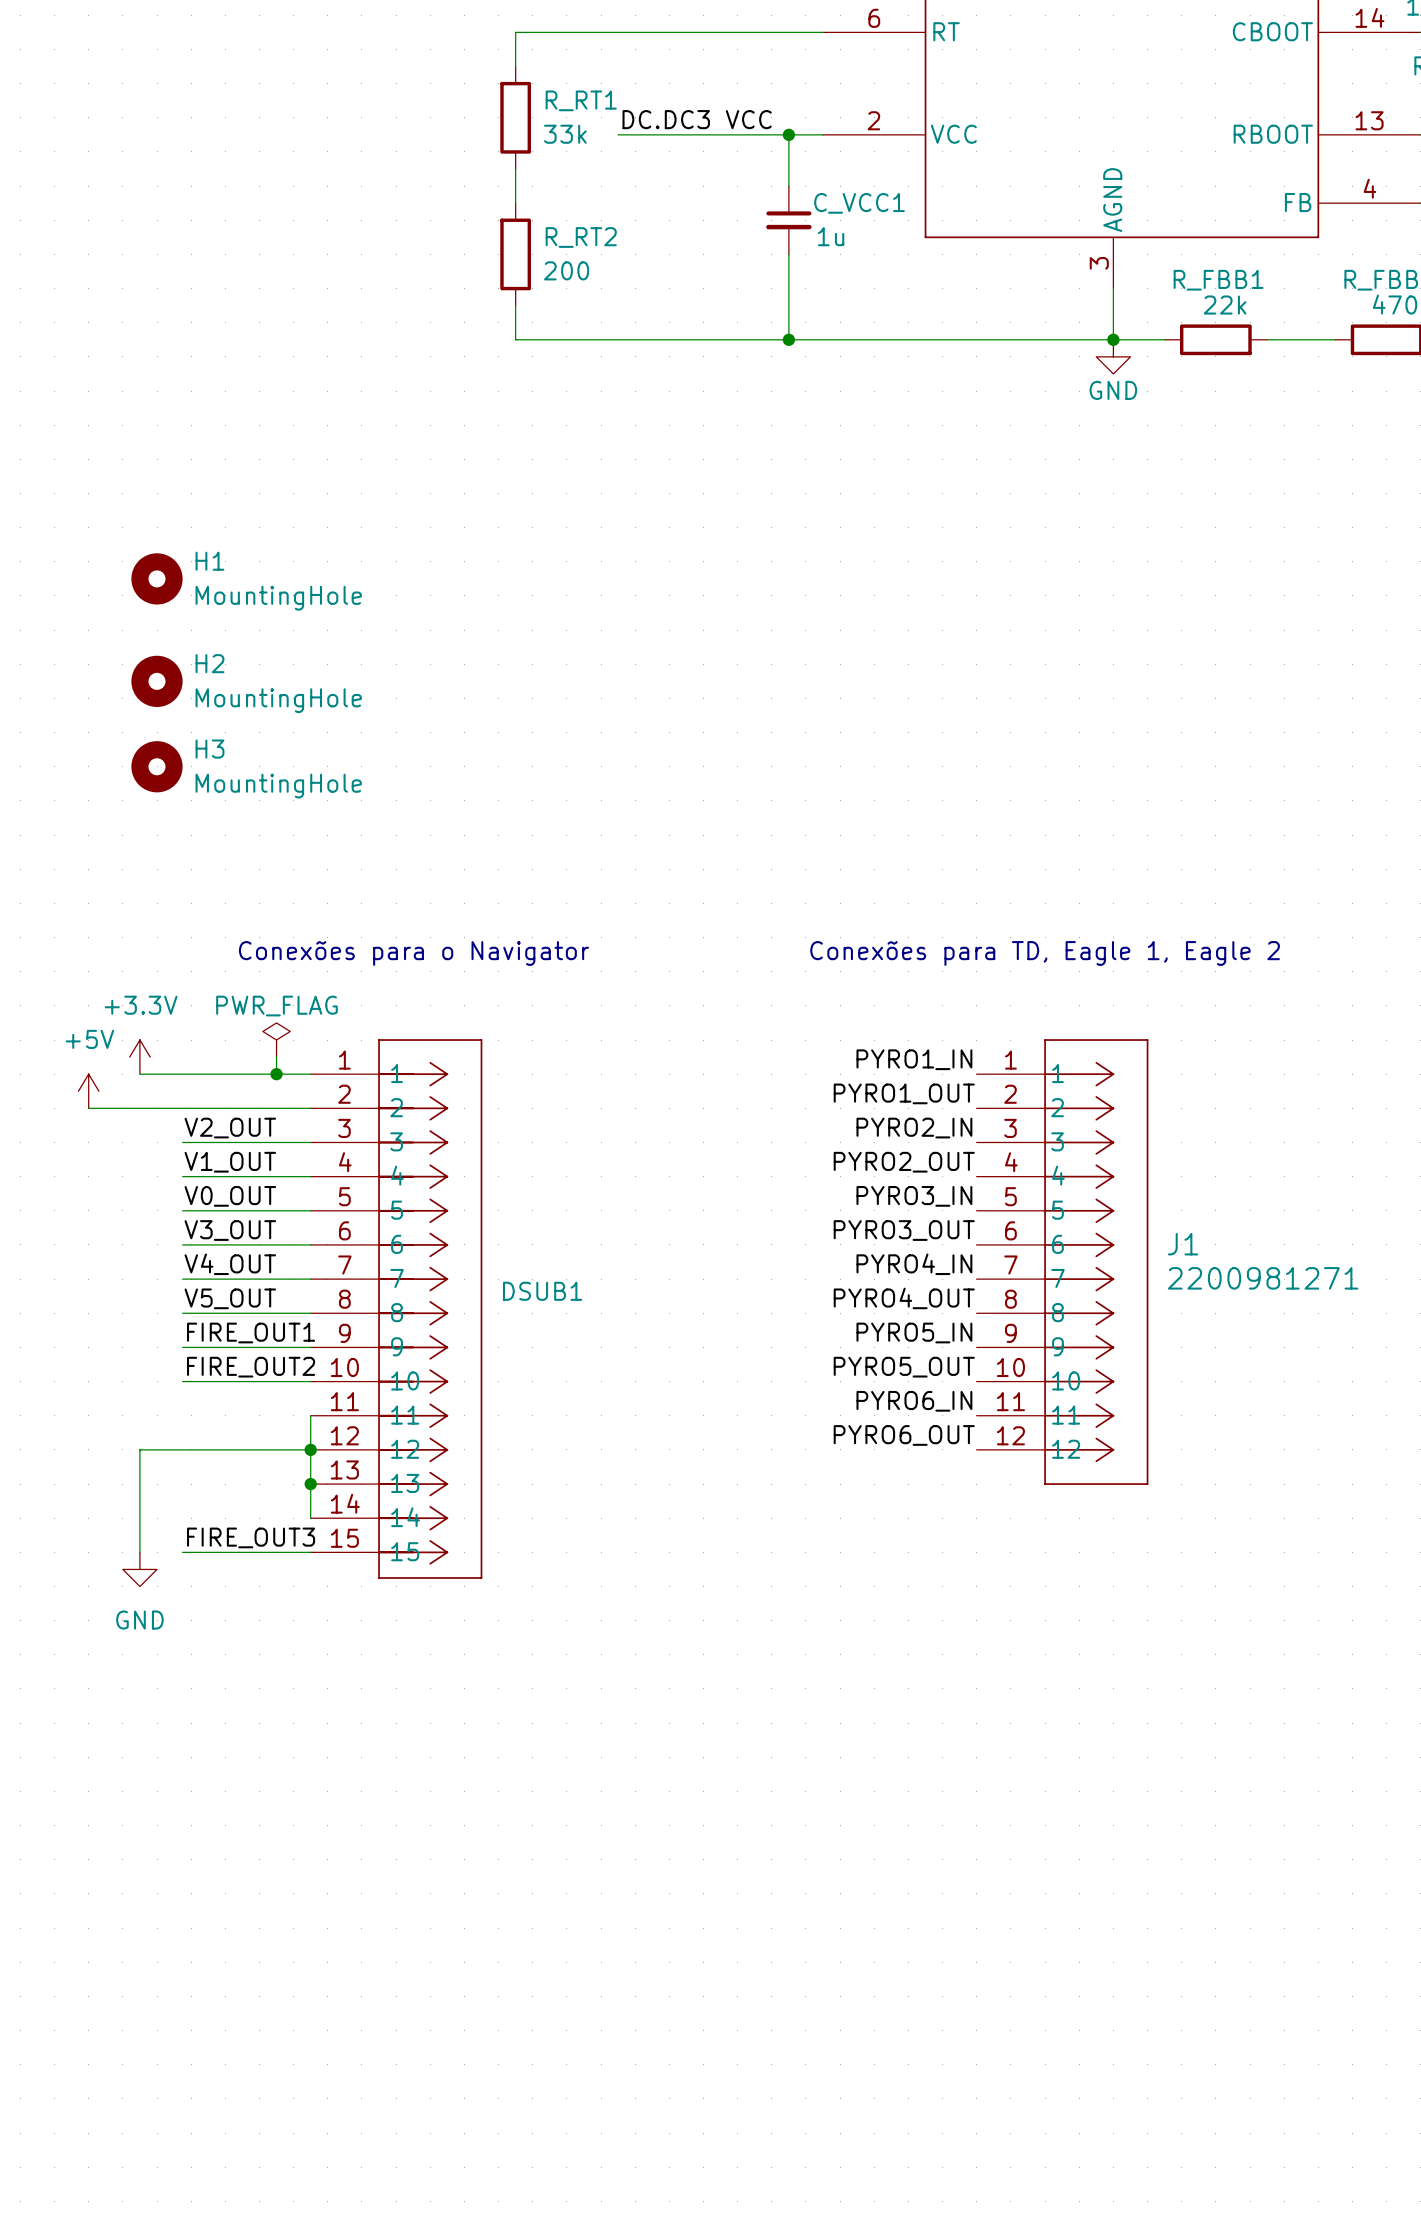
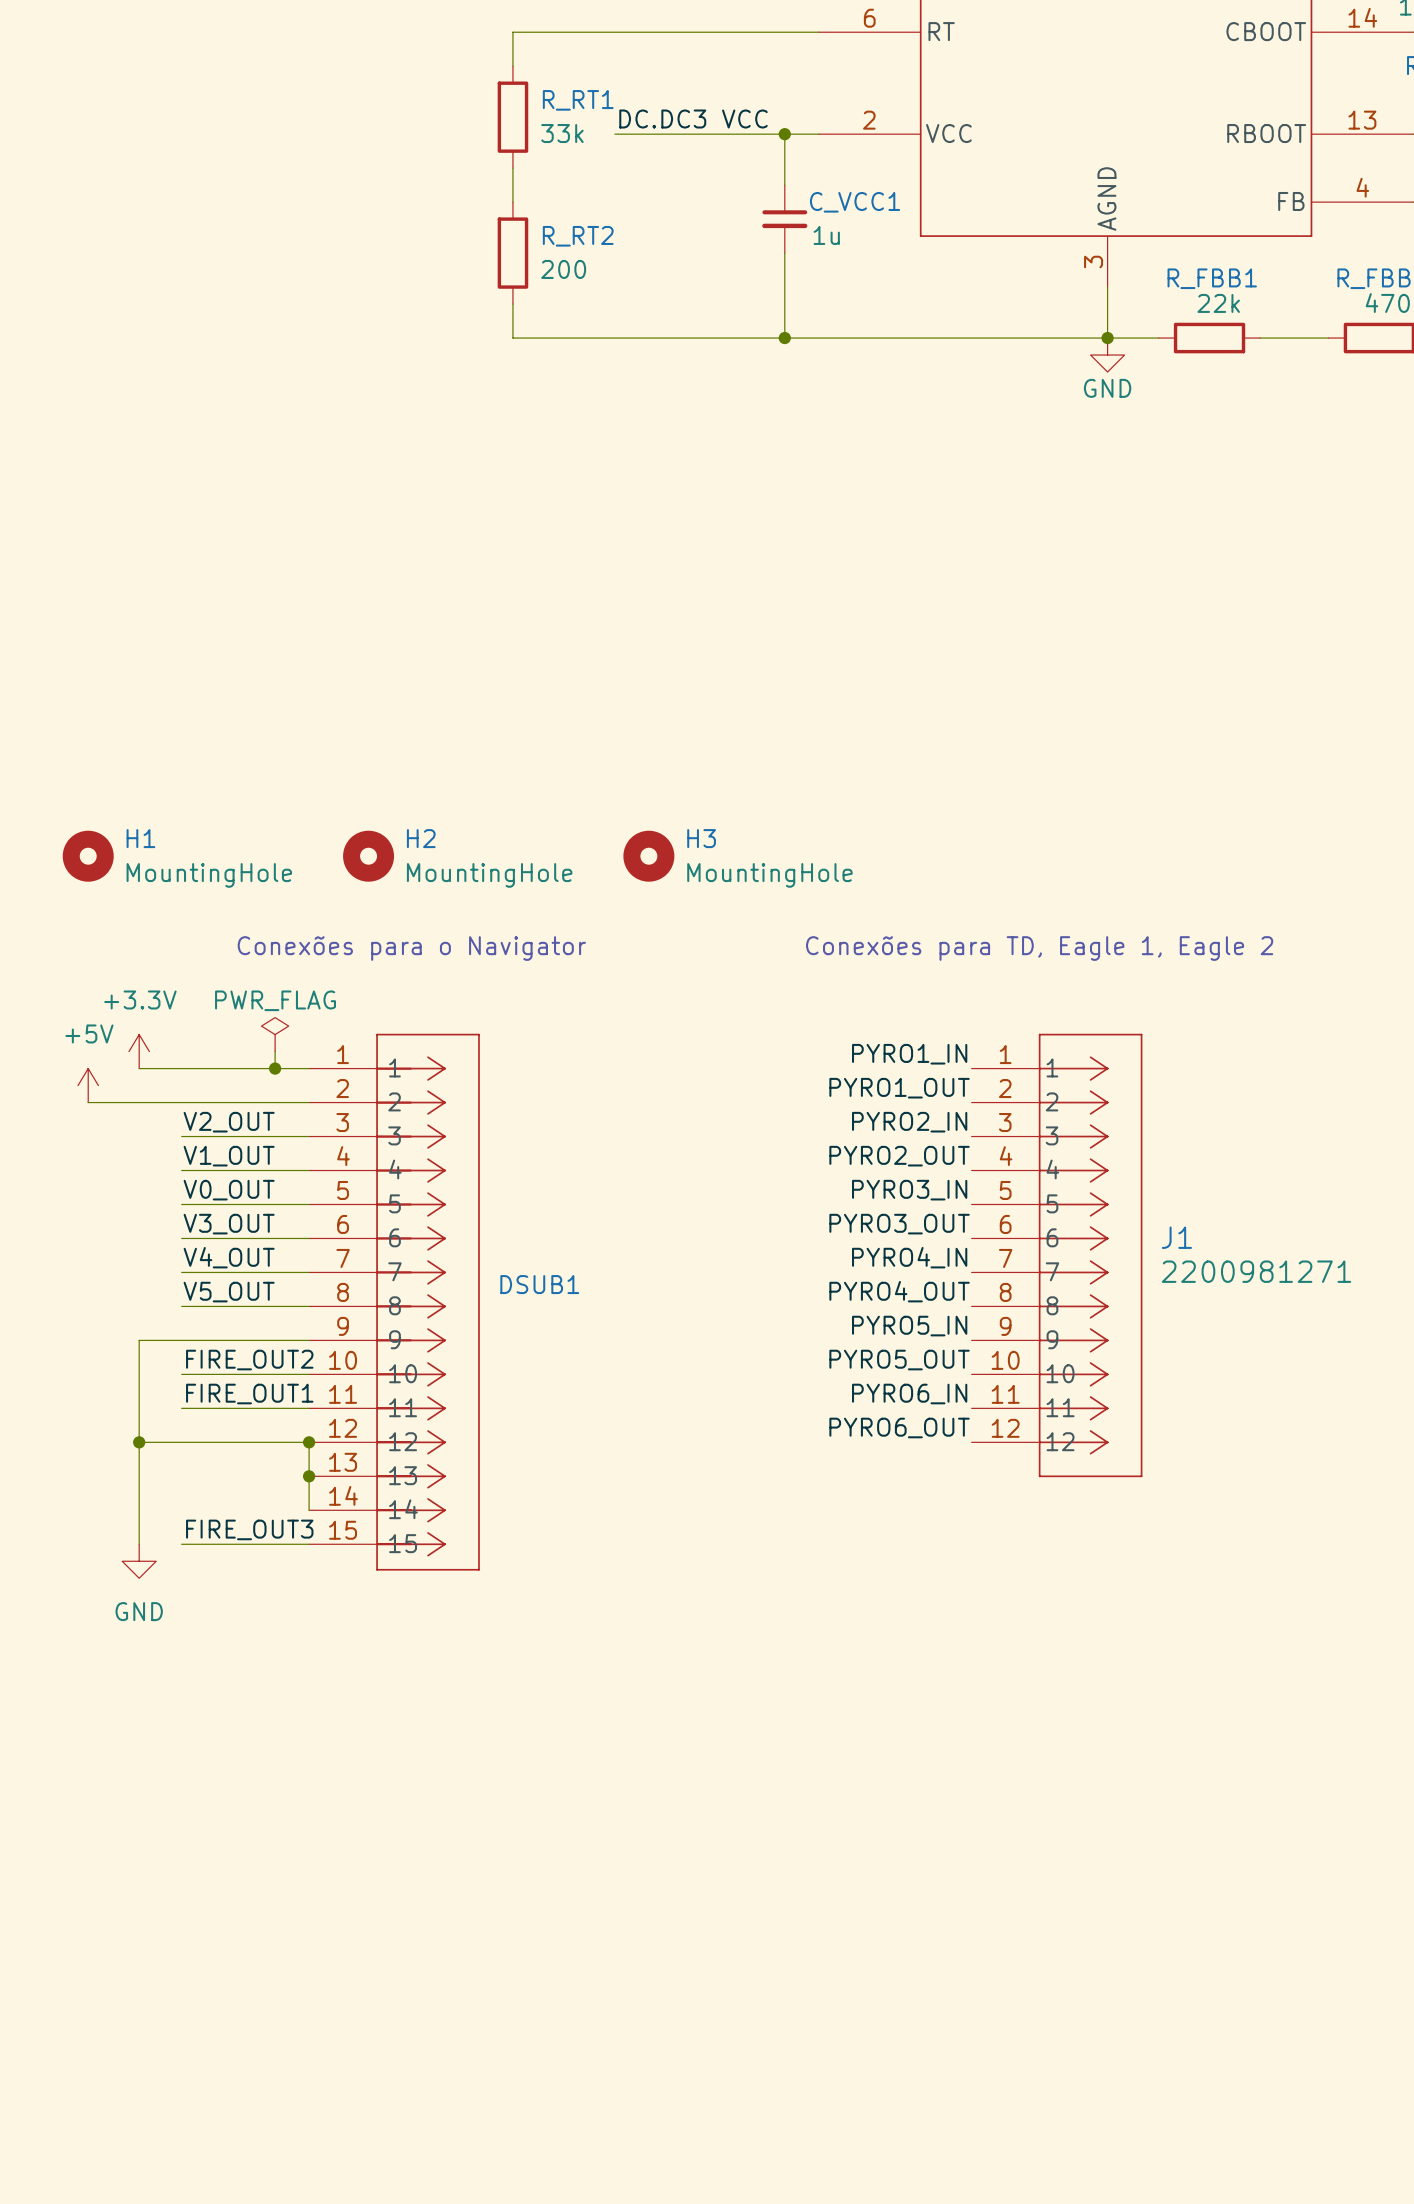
H1 position: (157, 578) -> (88, 856)
H2 position: (157, 681) -> (368, 856)
H3 position: (157, 766) -> (648, 856)
label position: FIRE_OUT1 (251, 1333) -> FIRE_OUT1 (249, 1394)
wire: none -> (181, 1340) (139, 1340) (139, 1442)
wire: (310, 1415) (310, 1449) -> (309, 1408) (181, 1408)
junction: none -> (139, 1442)

